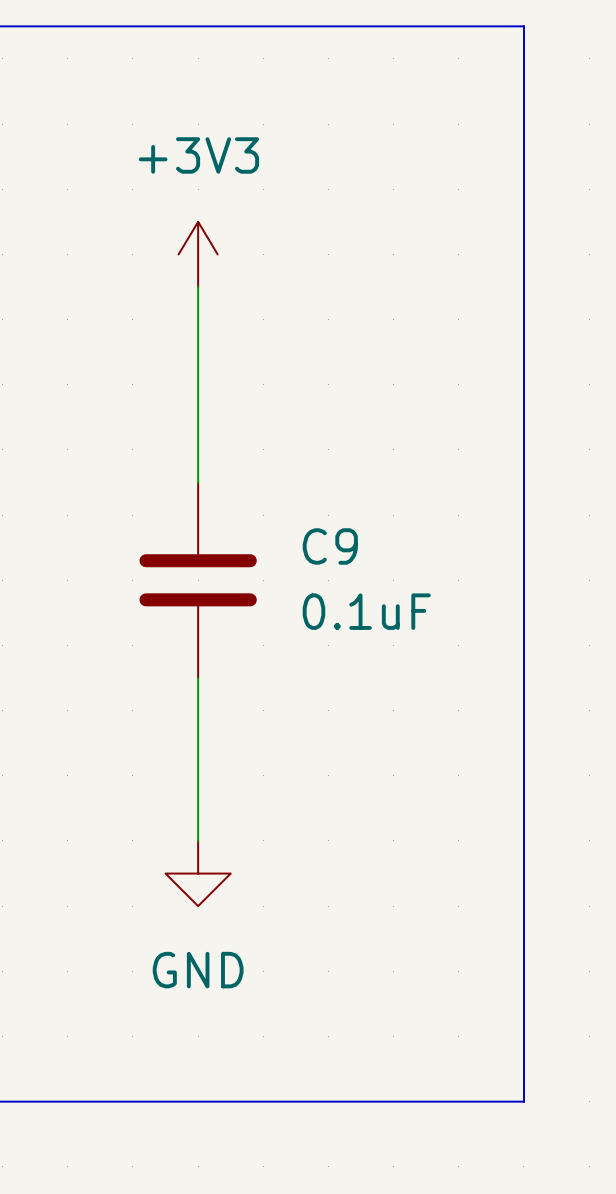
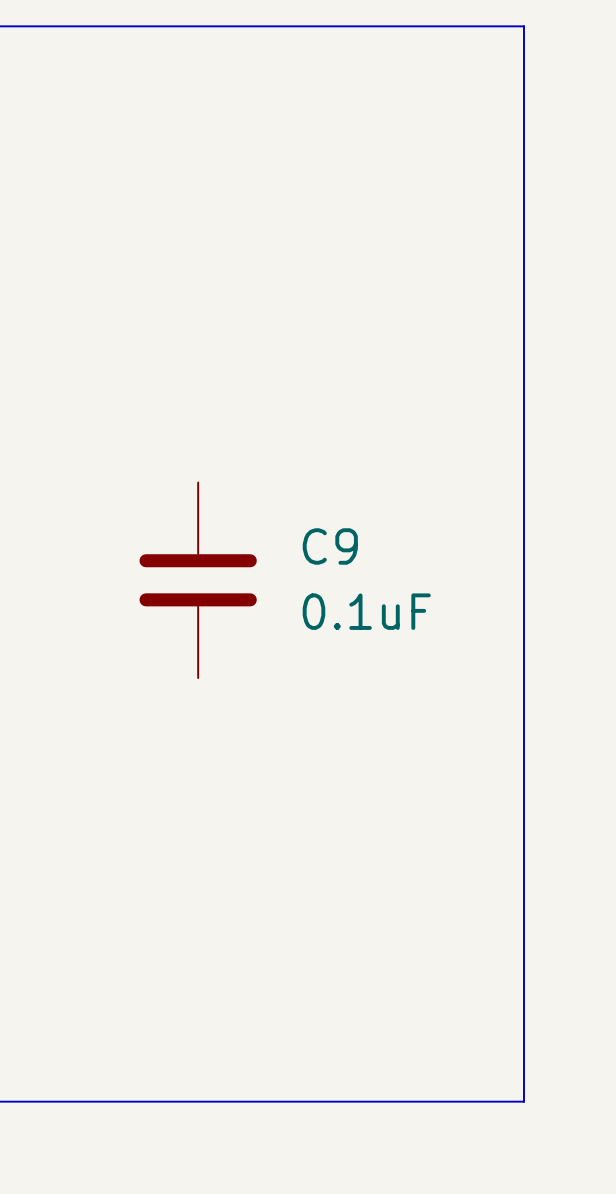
power symbol: +3V3 (198, 254) -> none
wire: (198, 287) (198, 482) -> none
wire: (198, 678) (198, 840) -> none
power symbol: GND (198, 873) -> none

